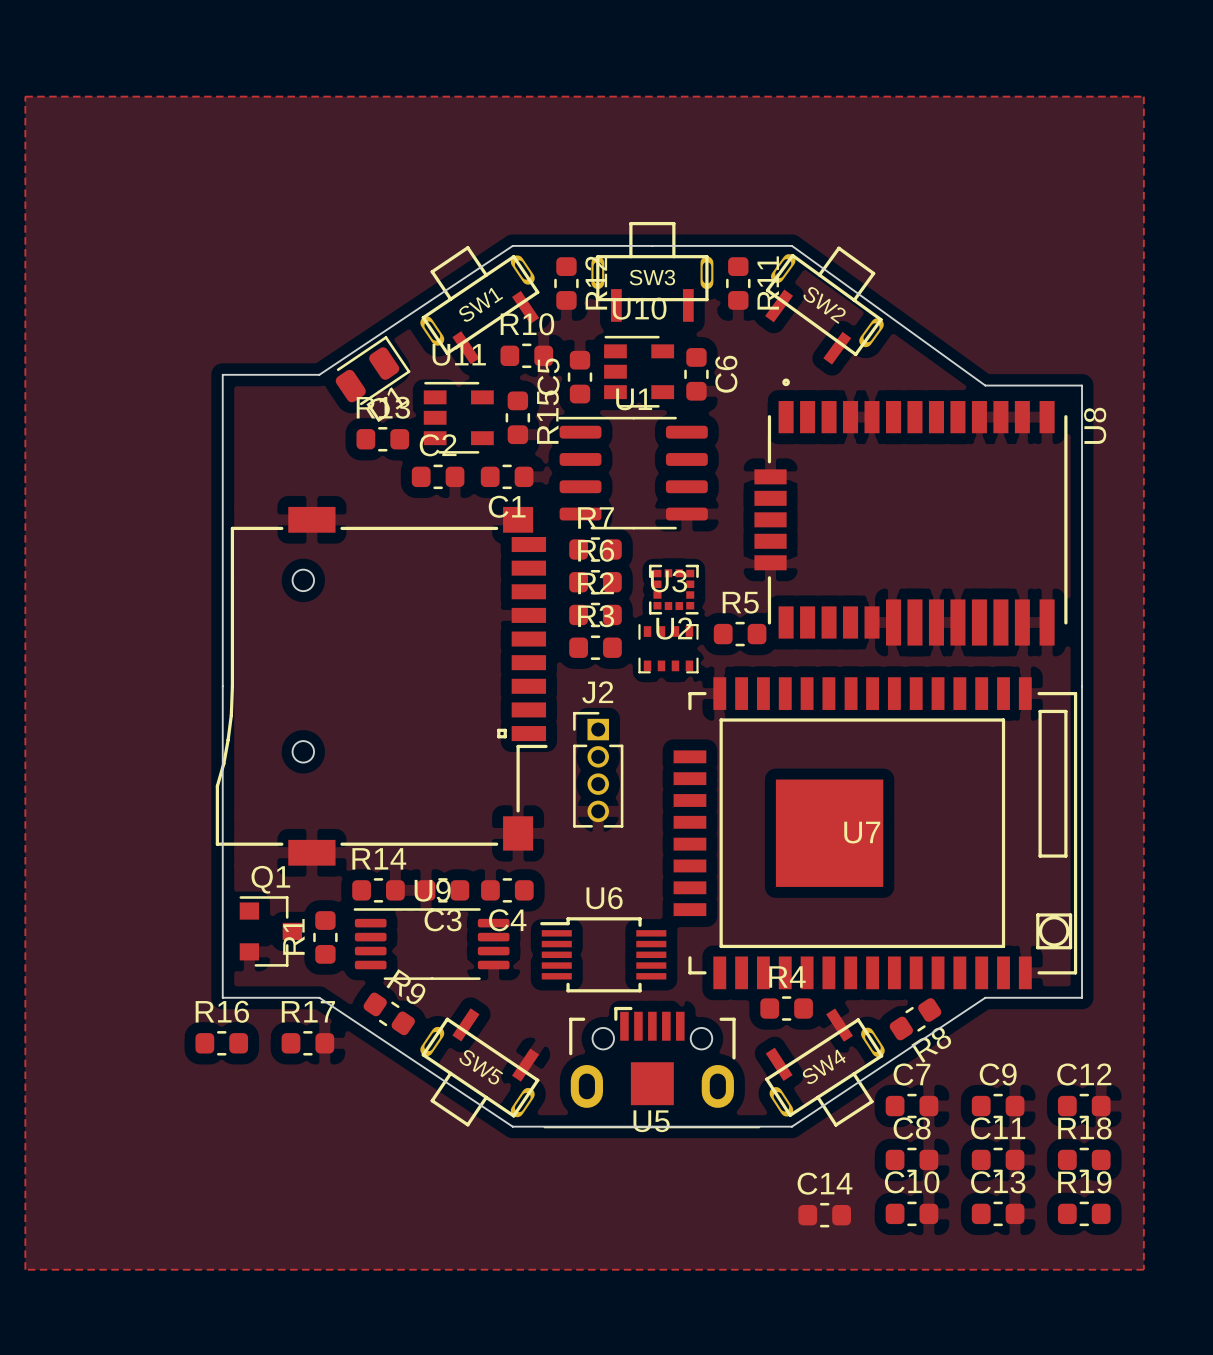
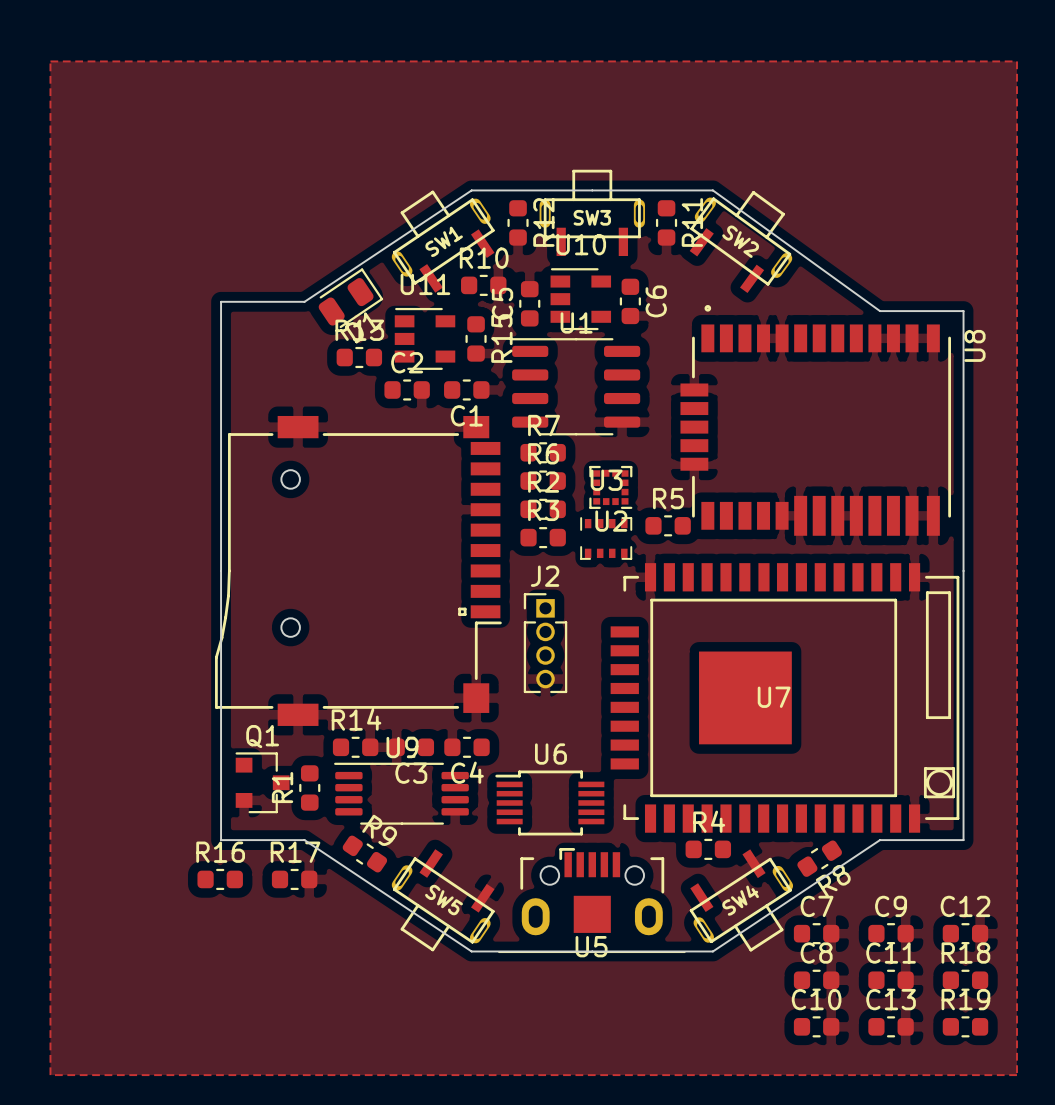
C14: (824, 1215) -> none

